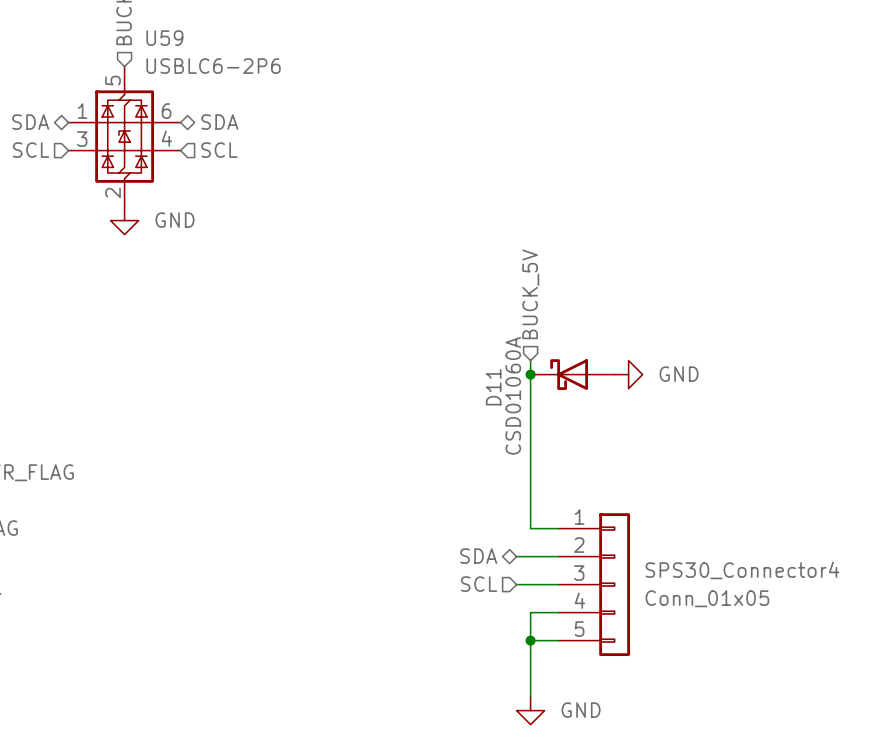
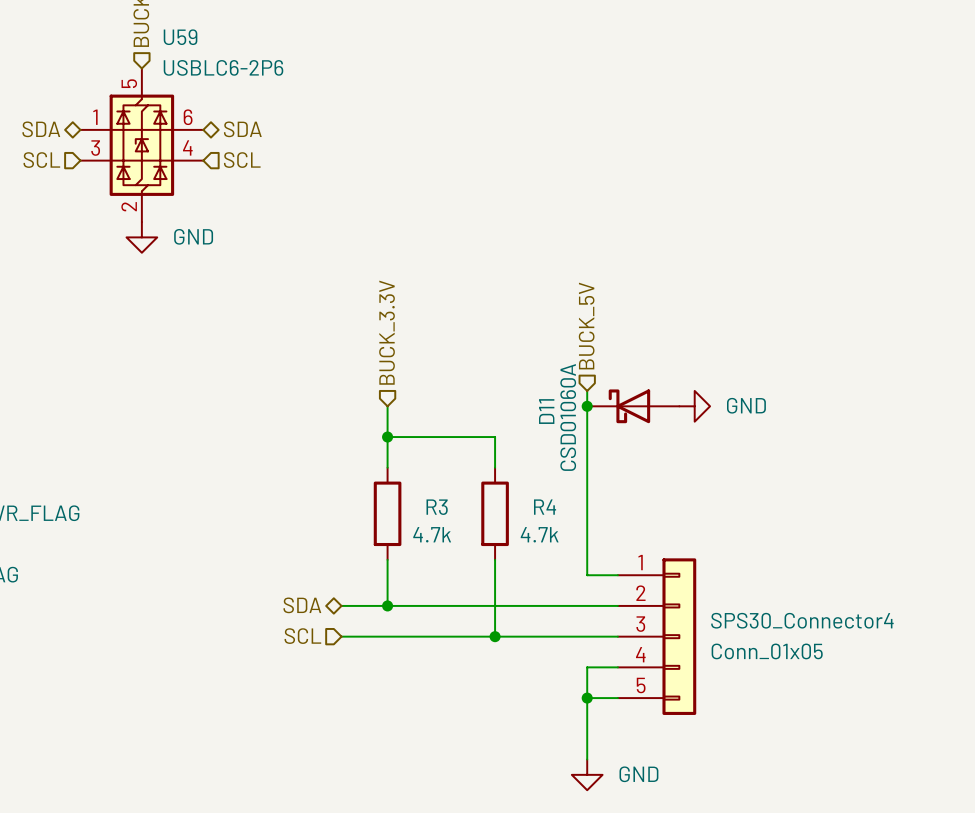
hierarchical label: none -> BUCK_3.3V (387, 332)
wire: none -> (387, 406) (387, 467)
wire: none -> (387, 437) (495, 437) (495, 467)
junction: none -> (387, 437)
R3: none -> 4.7k (387, 513)
R4: none -> 4.7k (495, 513)
wire: none -> (387, 559) (387, 605)
wire: none -> (495, 559) (495, 636)
wire: none -> (341, 605) (571, 605)
junction: none -> (387, 605)
hierarchical label position: SDA (478, 556) -> SDA (302, 605)
wire: none -> (341, 636) (571, 636)
junction: none -> (495, 636)
hierarchical label position: SCL (479, 584) -> SCL (302, 636)

